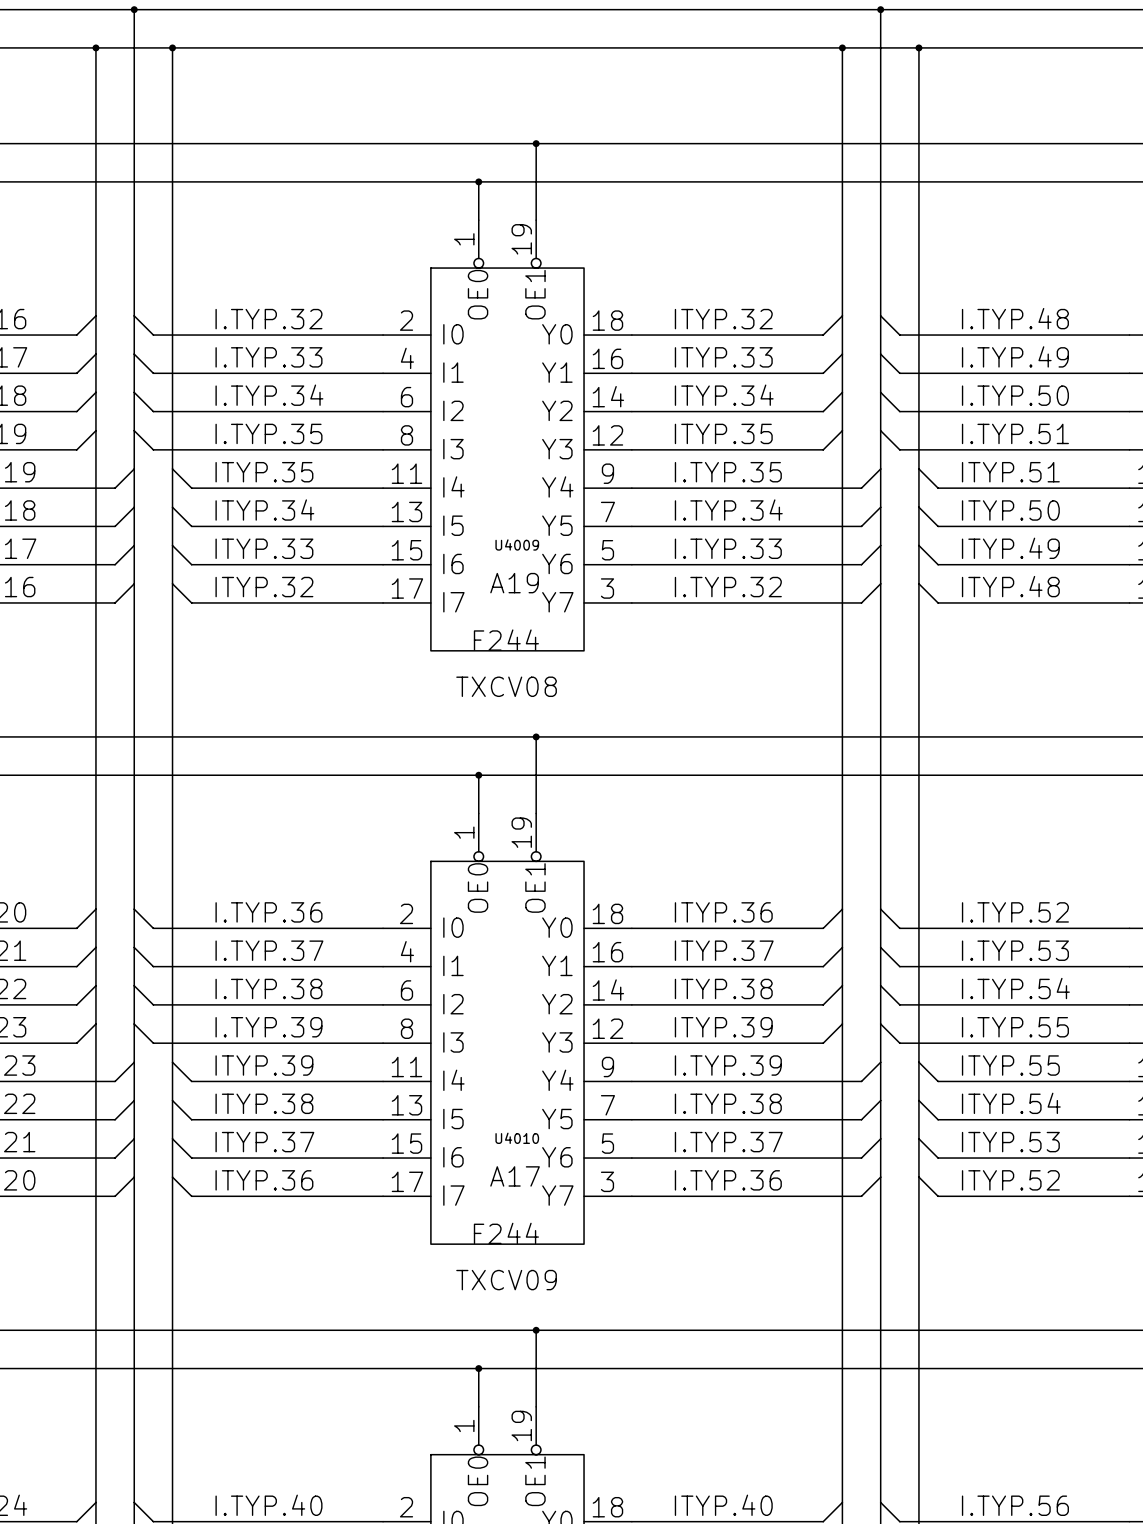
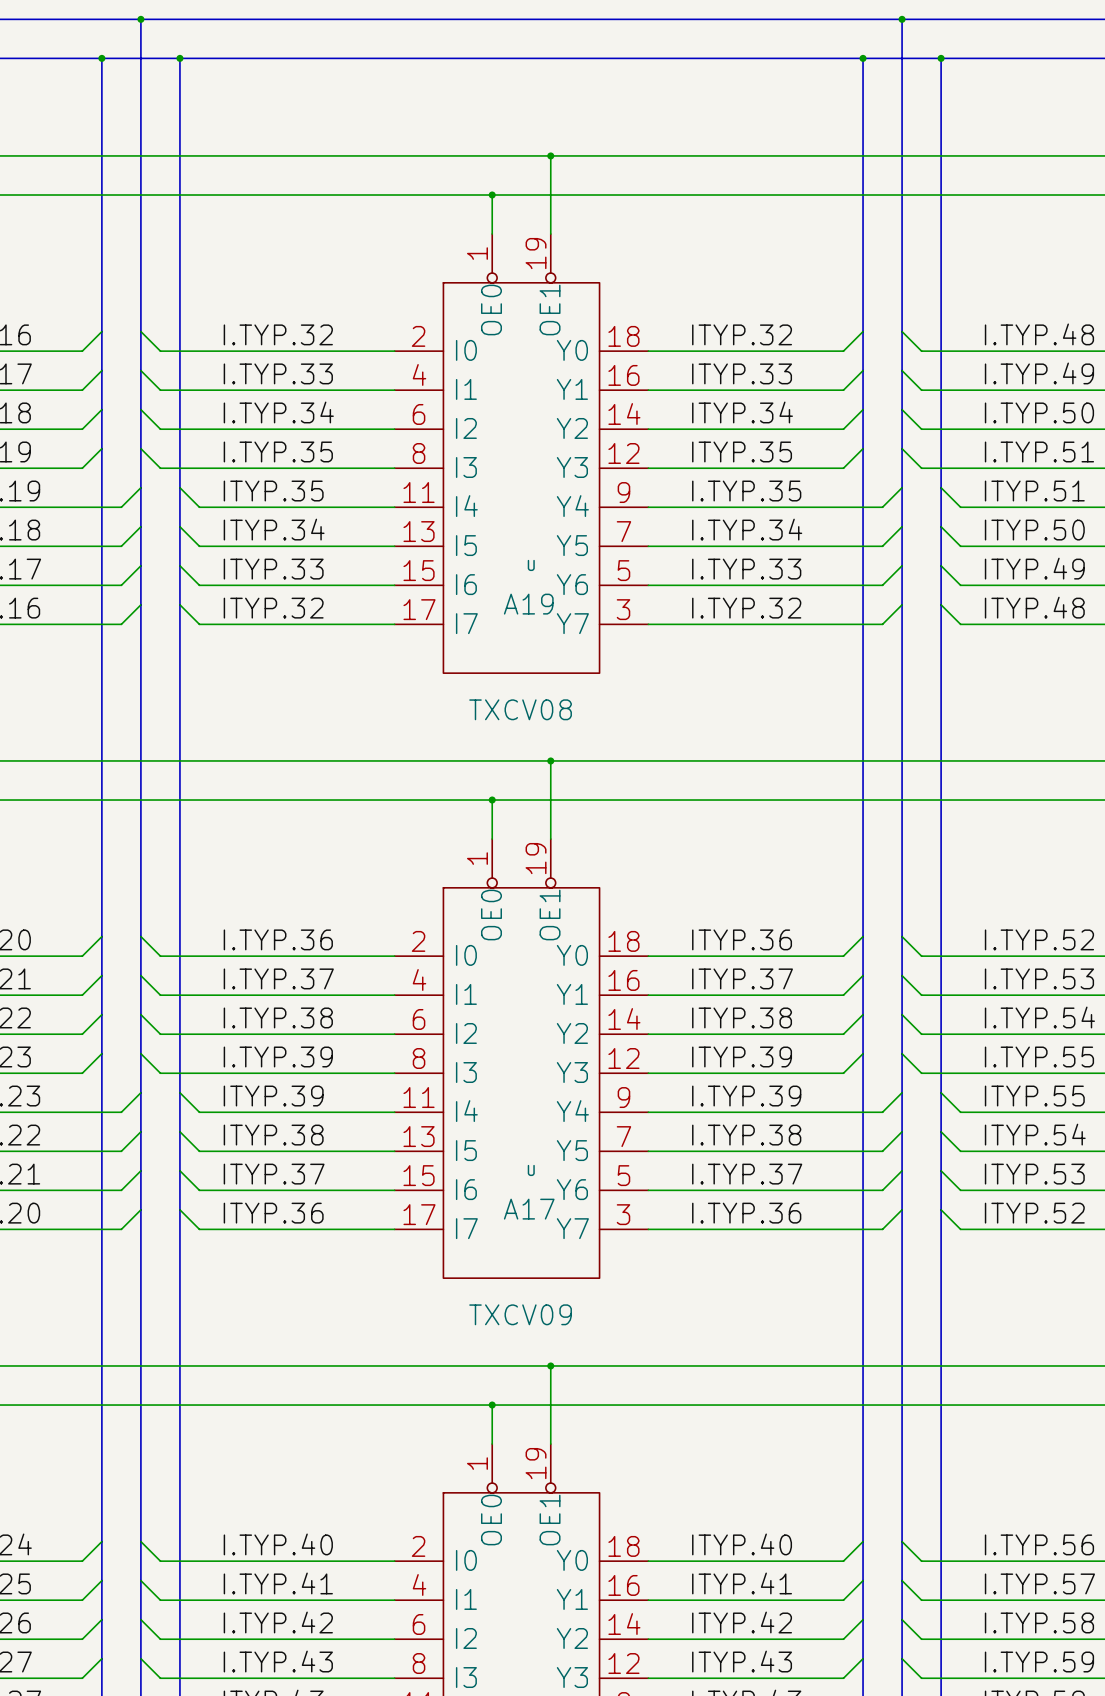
U4009 name: U4009 (517, 544) -> U (531, 565)
U4009 value: F244 (506, 640) -> none
U4010 name: U4010 (517, 1138) -> U (531, 1170)
U4010 value: F244 (506, 1233) -> none

